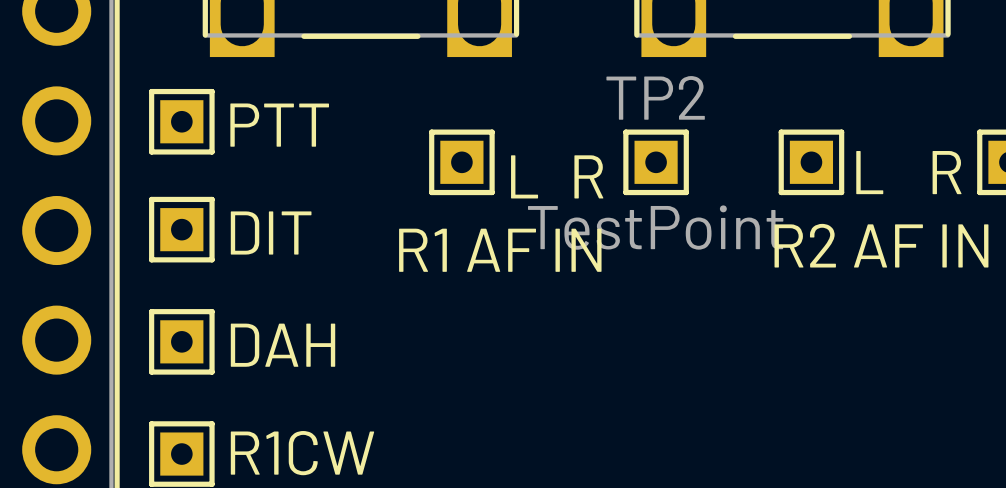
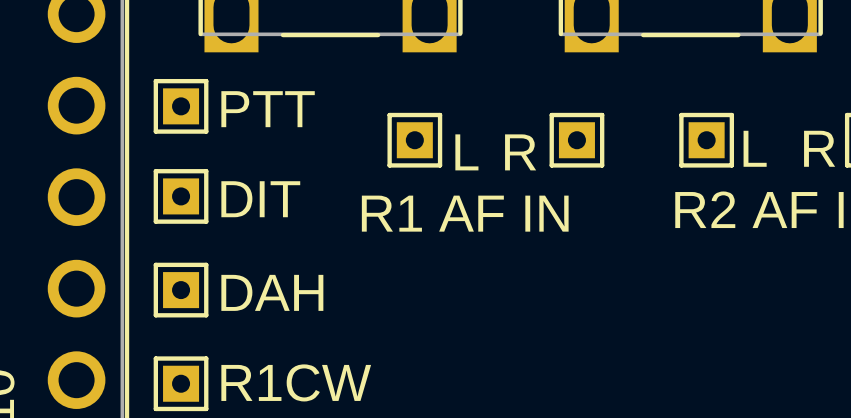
TP2 name: TP2 (655, 97) -> none
TP2 value: TestPoint (655, 227) -> none

